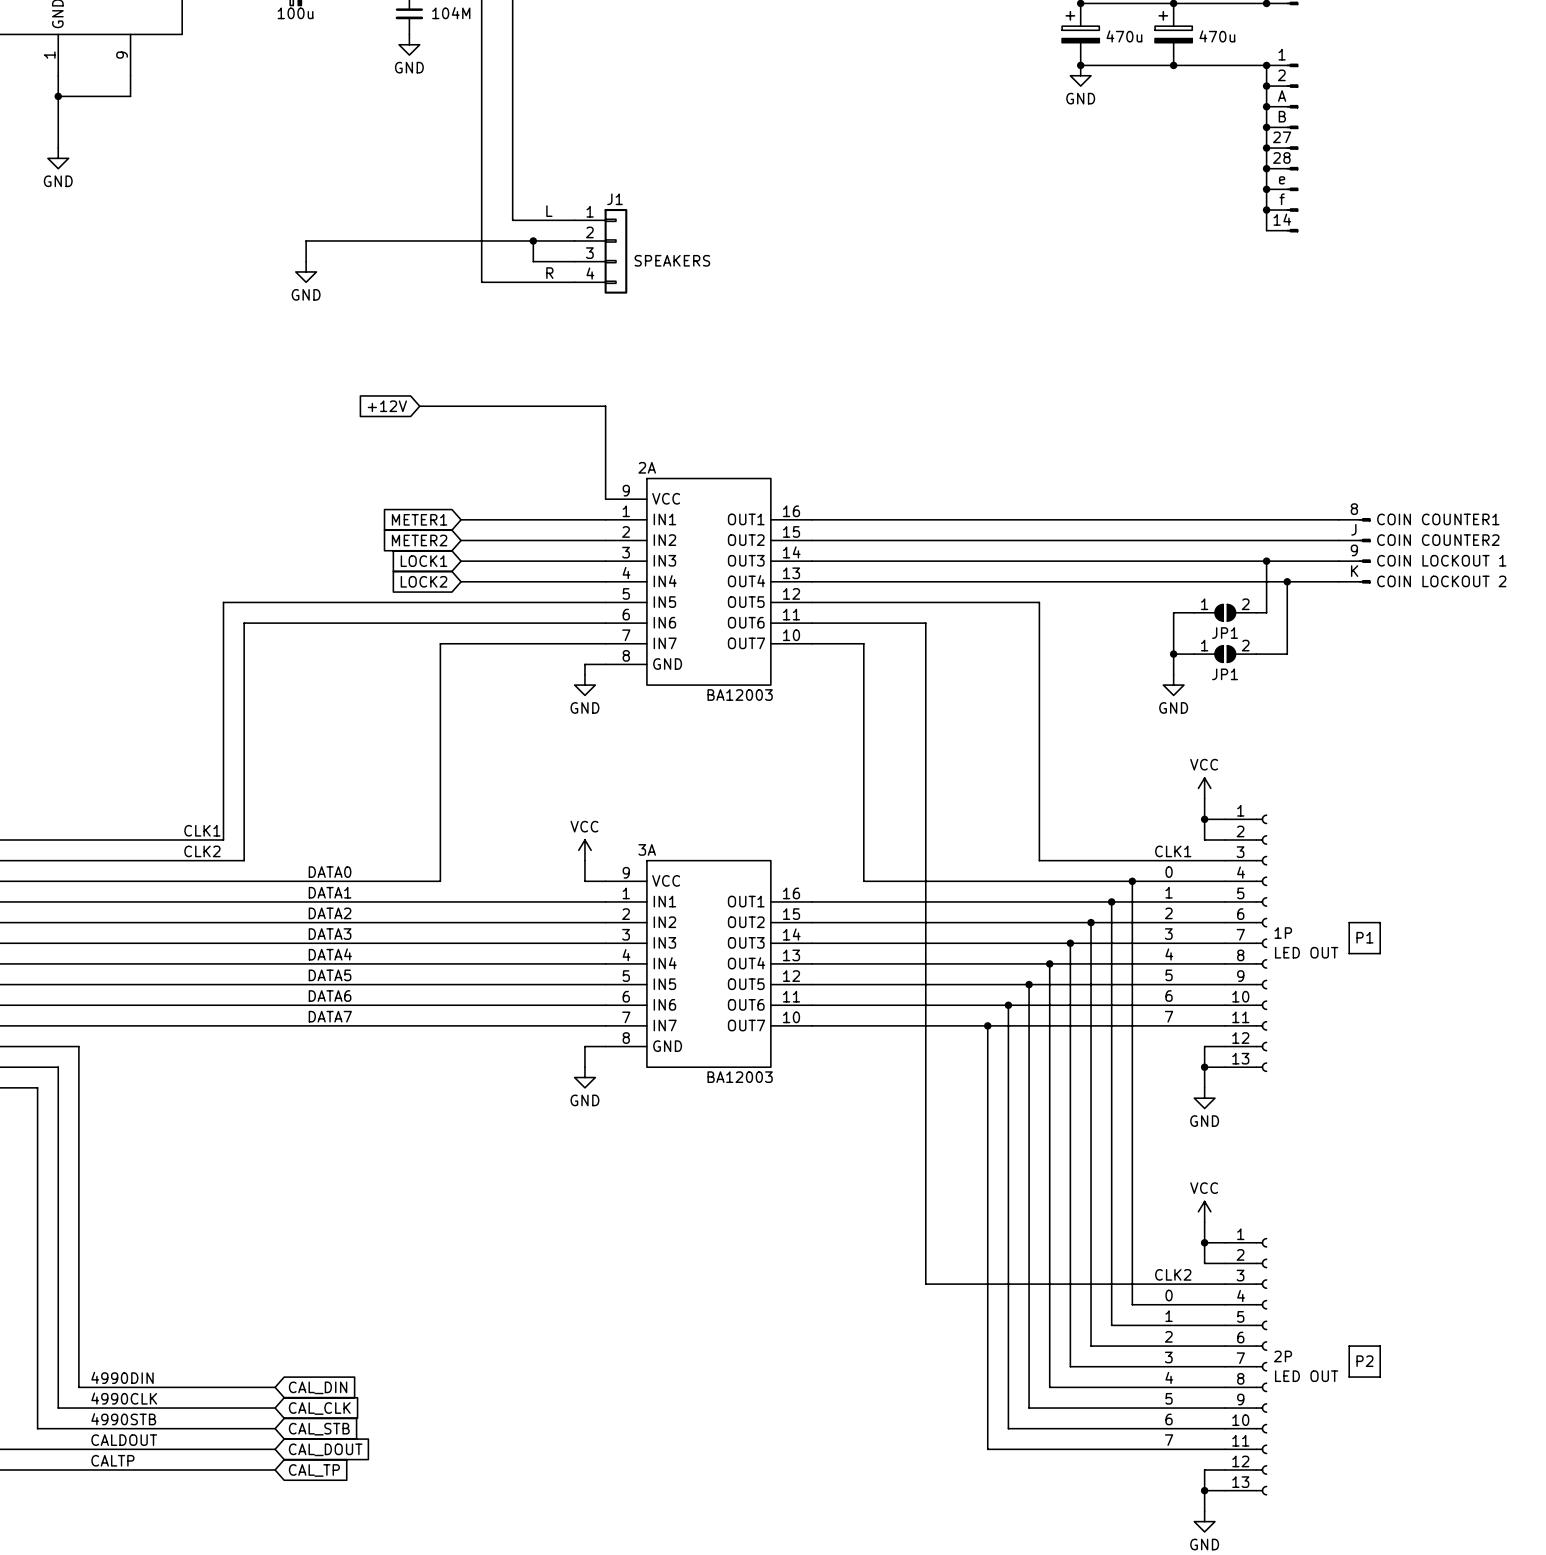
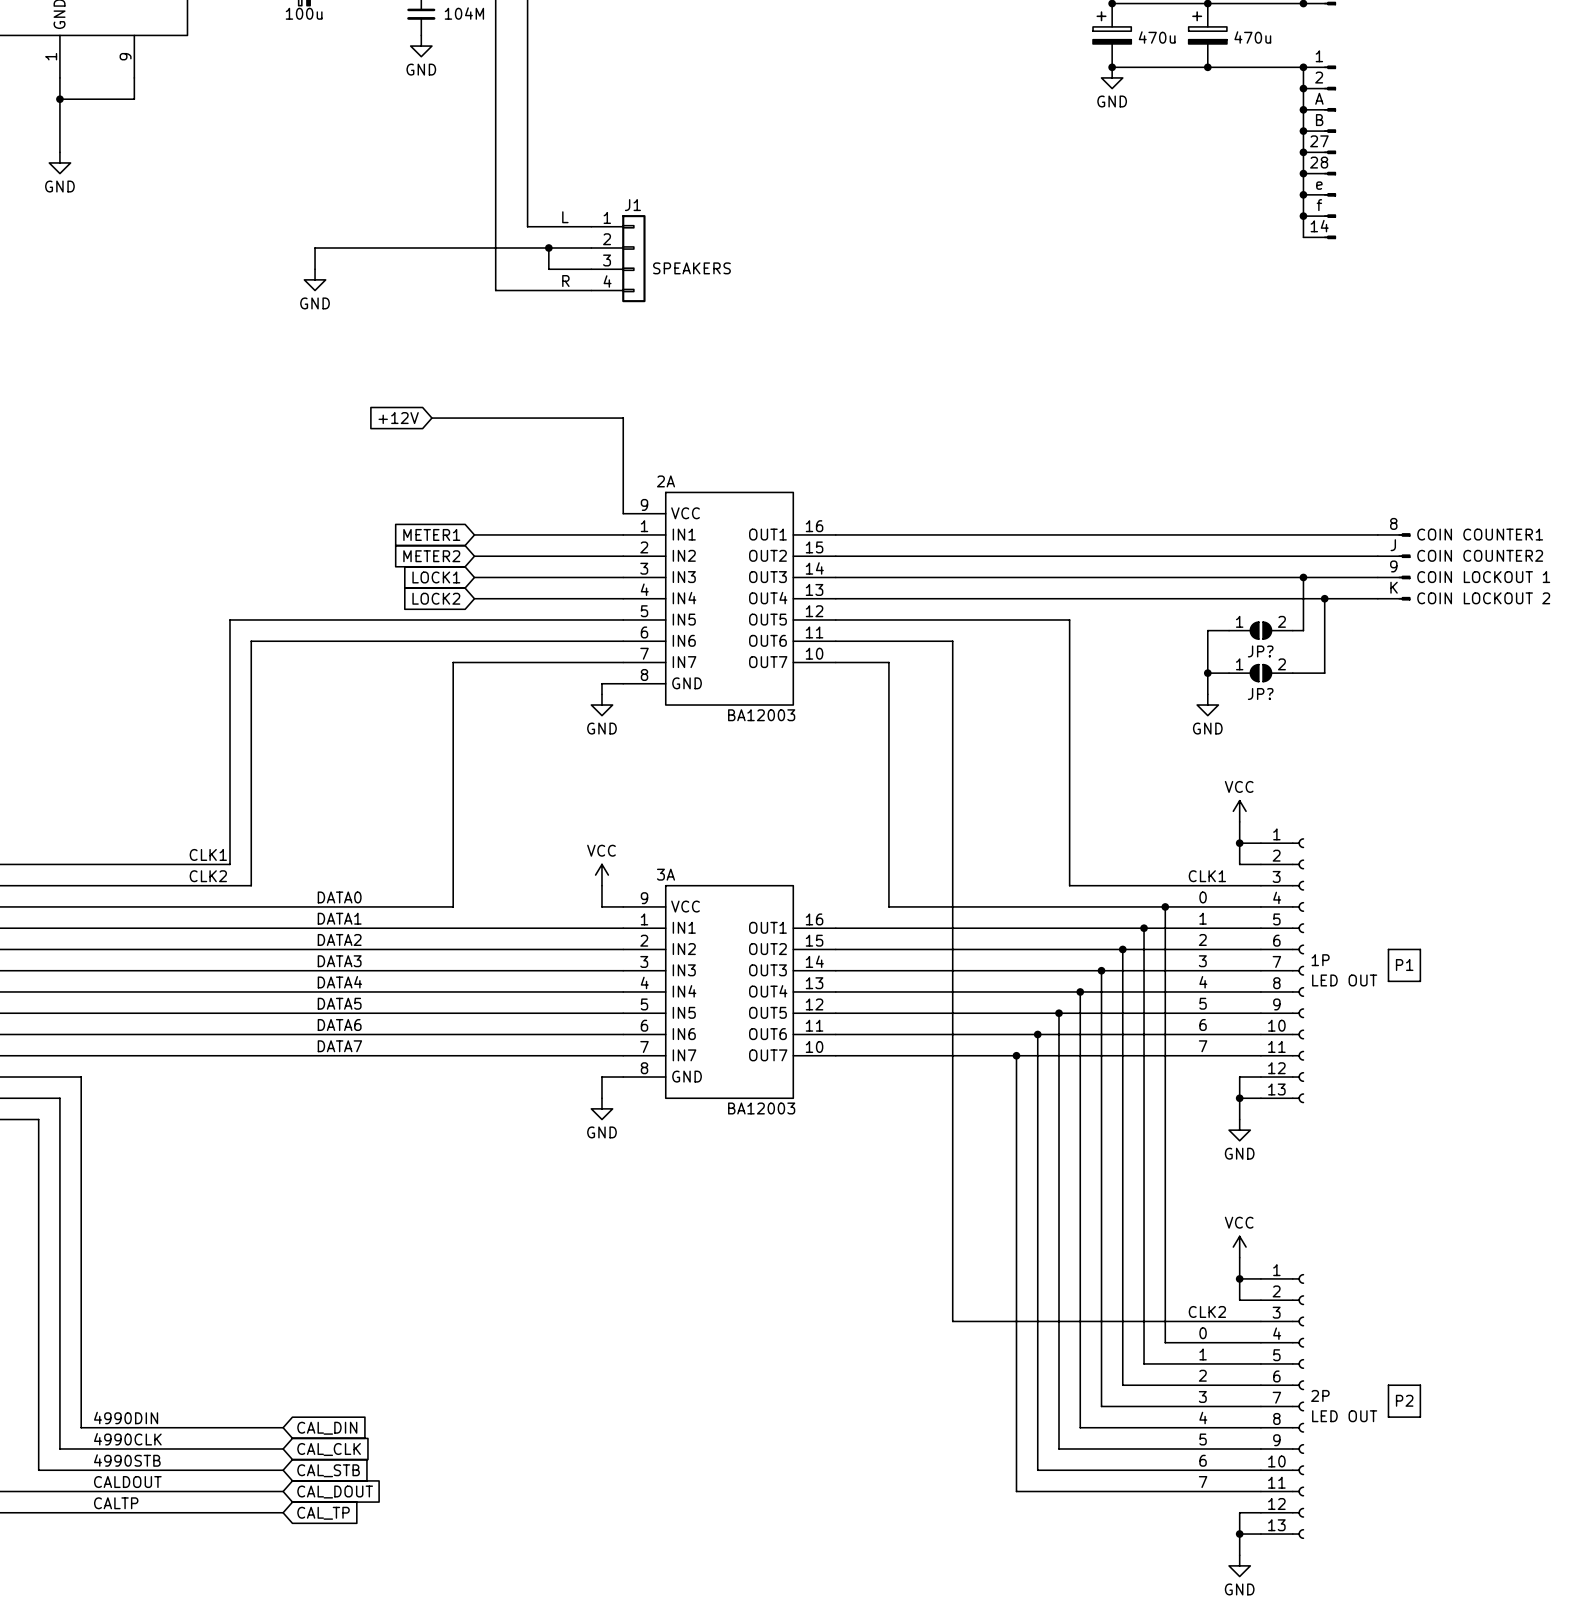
JP1 name: JP1 (1225, 633) -> JP? (1260, 651)
JP1 name: JP1 (1225, 674) -> JP? (1260, 693)

